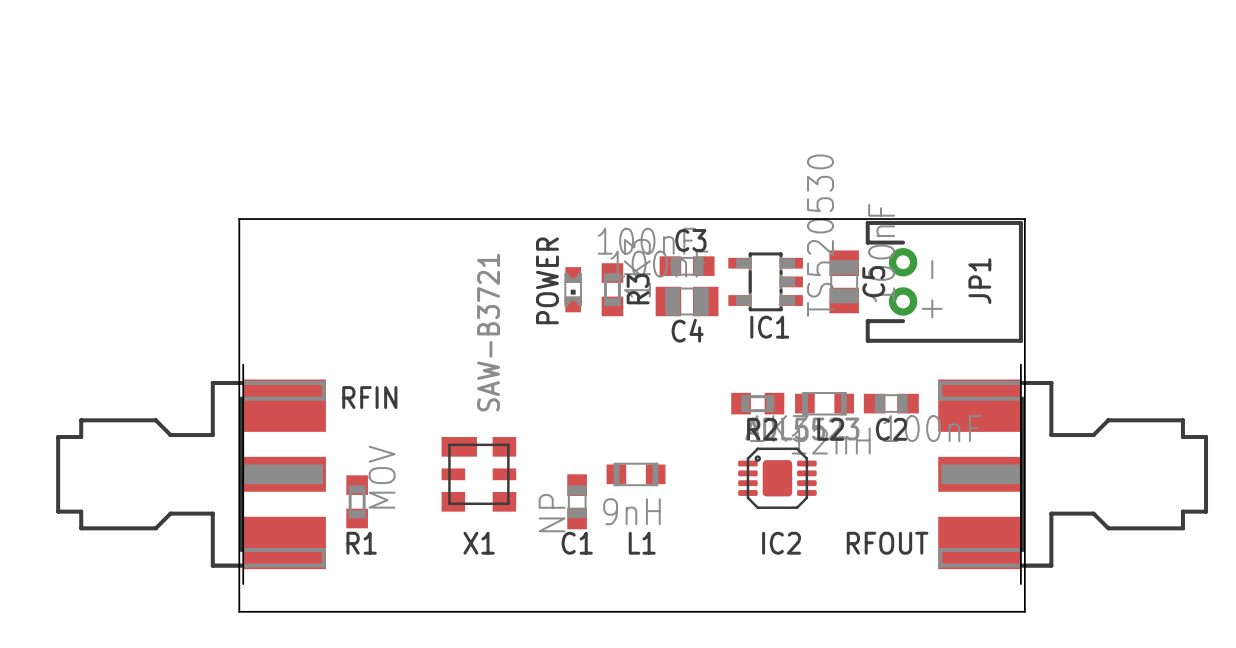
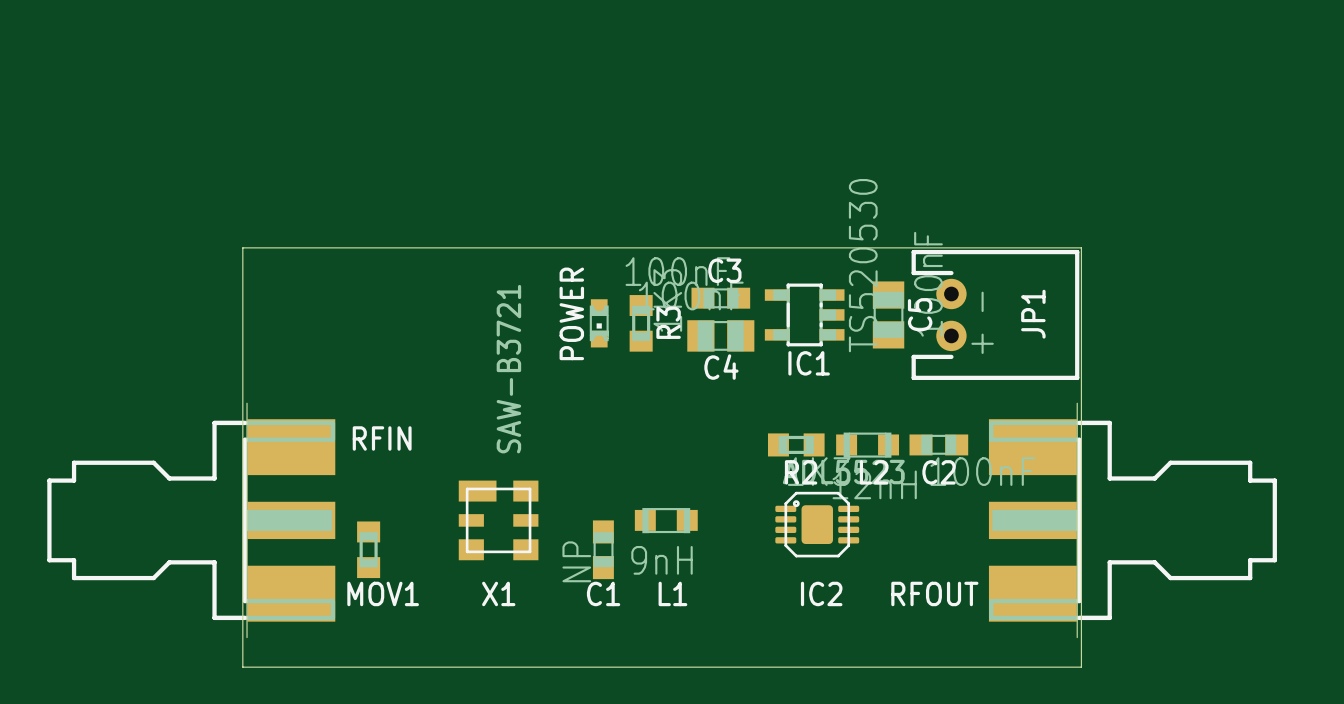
R1 value: MOV (382, 477) -> none
R1 name: R1 (361, 543) -> MOV1 (383, 593)

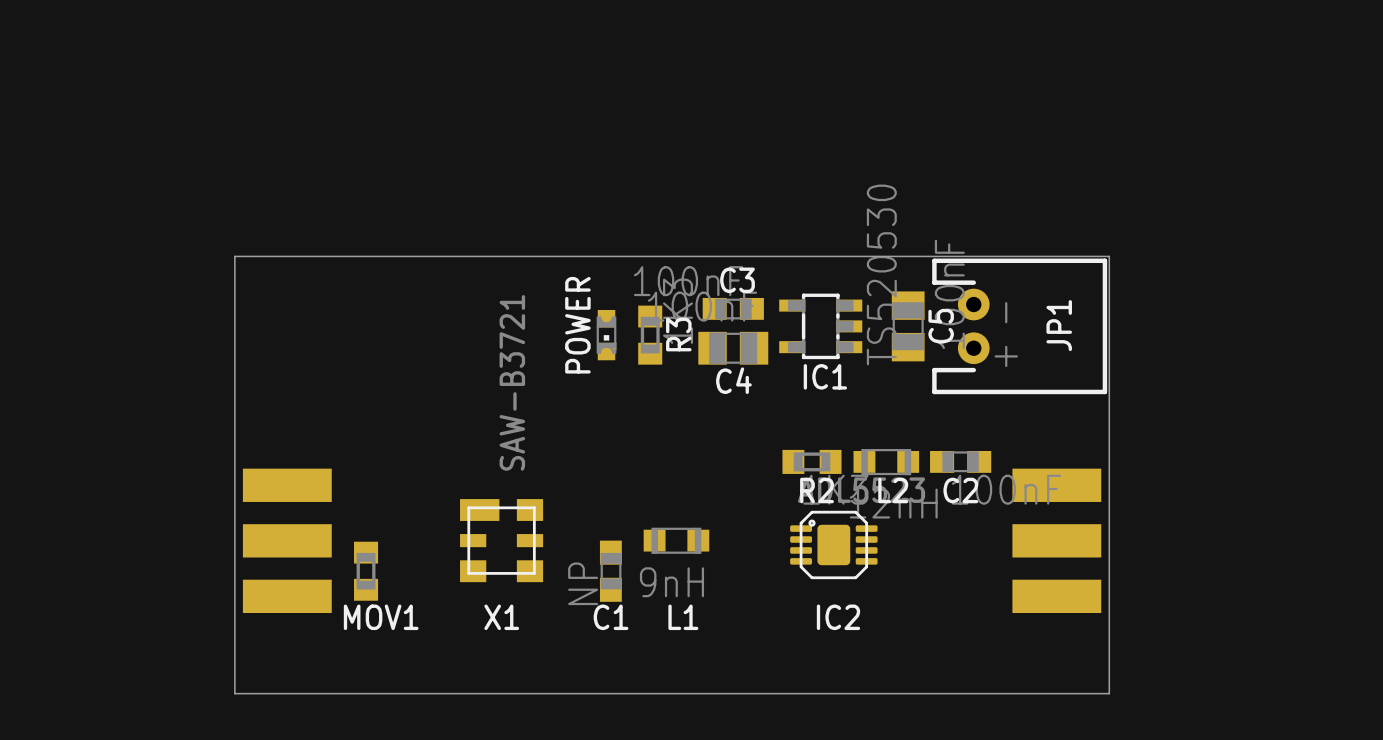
RFIN: (191, 520) -> none
part: none -> (287, 540)
part: none -> (1056, 540)
RFOUT: (1132, 520) -> none

